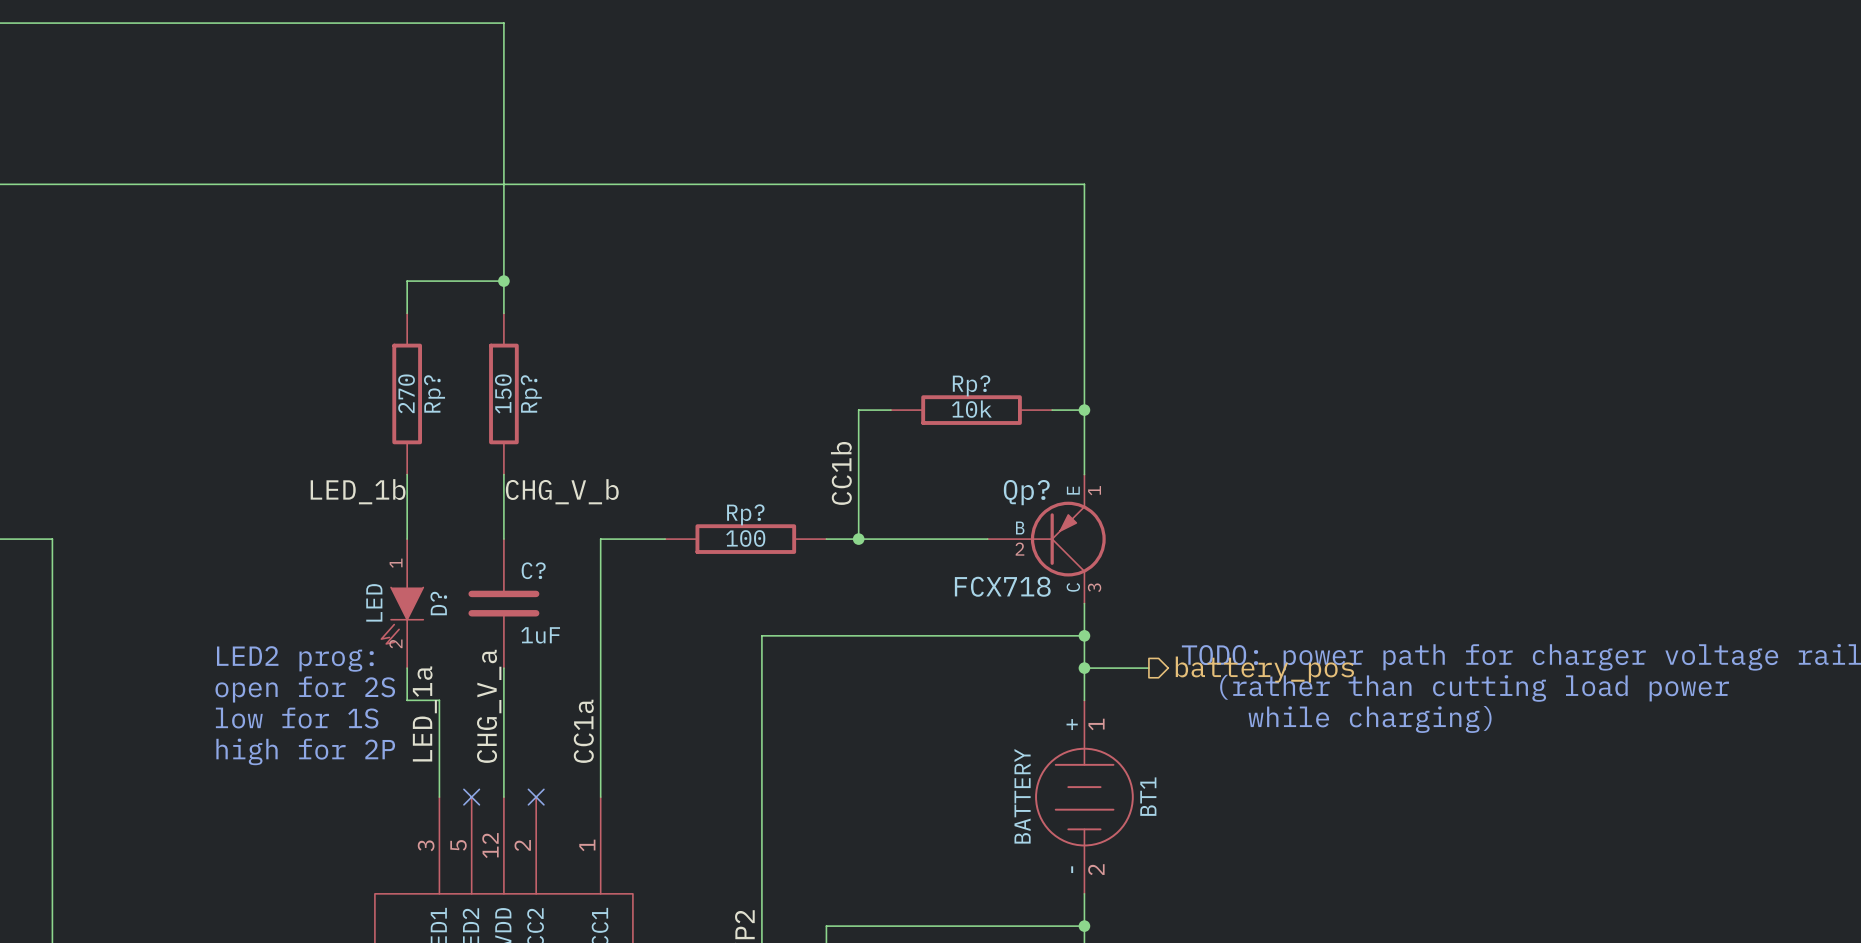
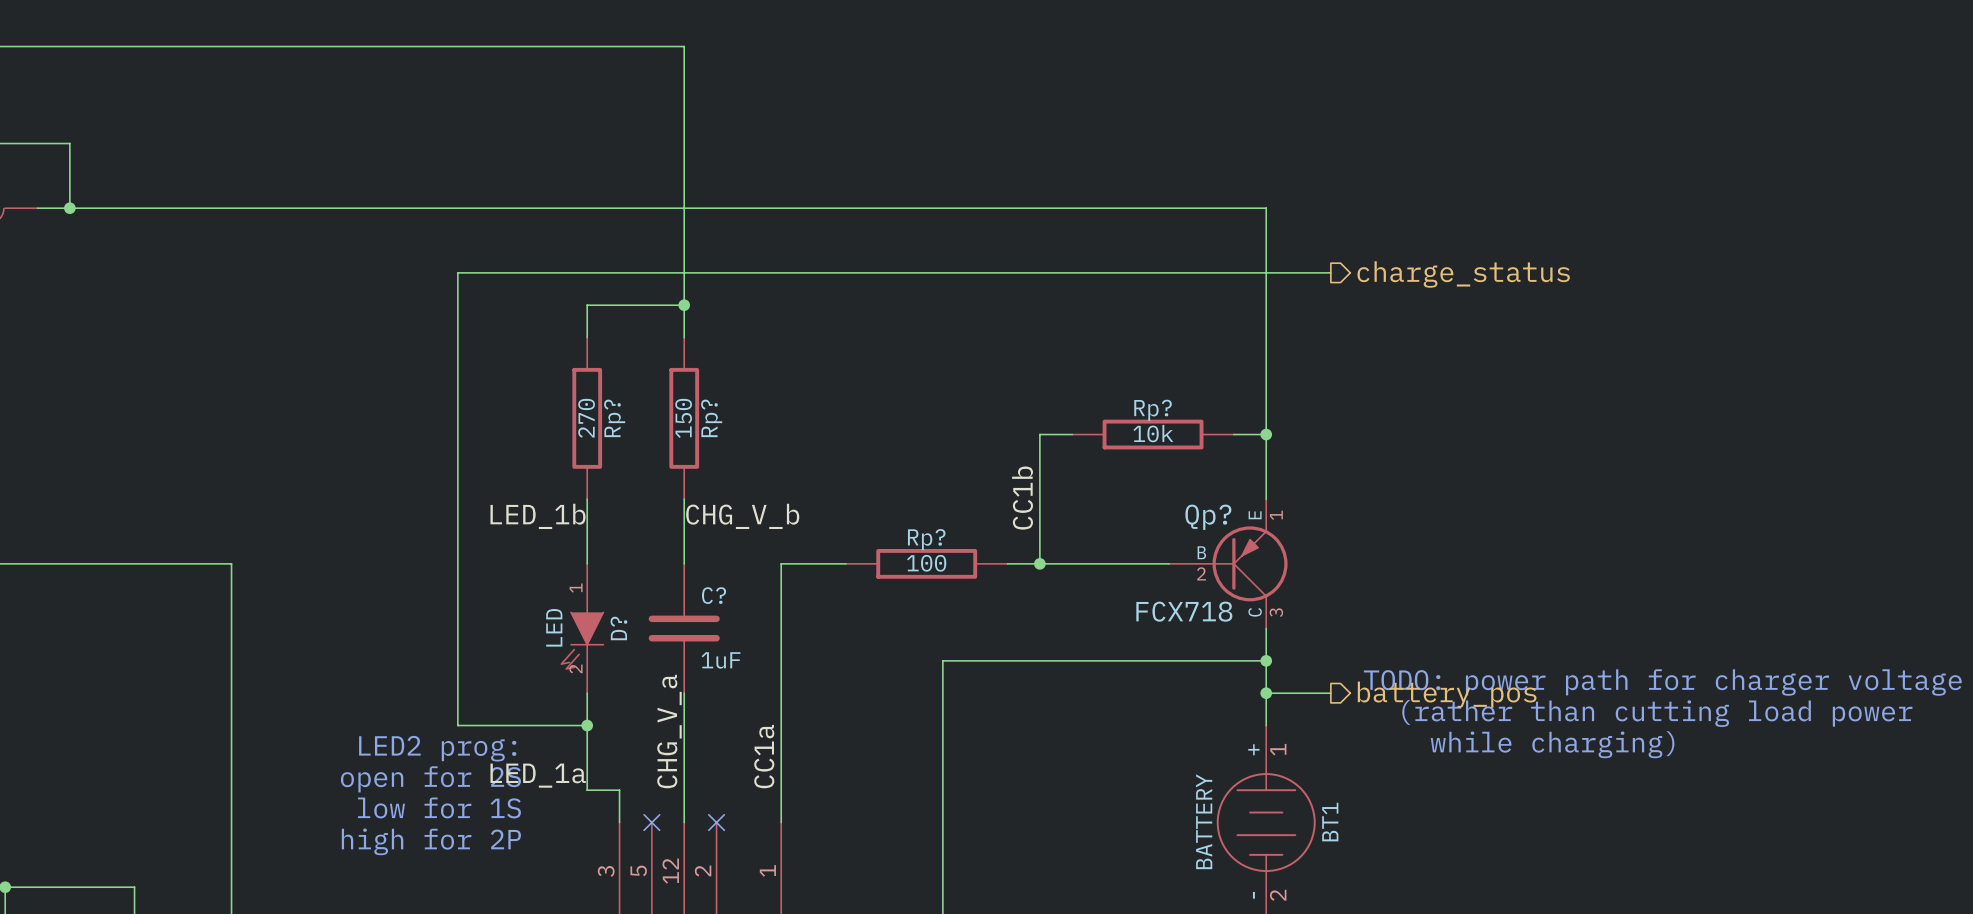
hierarchical label: none -> charge_status (1463, 274)
text position: LED2 prog: (295, 658) -> LED2 prog: (437, 748)
text position: open for 2S (305, 689) -> open for 2S (430, 779)
wire: (407, 700) (439, 700) (439, 764) -> (1330, 272) (457, 272) (457, 725) (587, 725) (587, 790) (619, 790)
junction: none -> (587, 725)
label rotation: 0° (424, 713) -> 90° clockwise (538, 775)
text position: low for 1S (297, 718) -> low for 1S (439, 807)
text position: high for 2P (305, 751) -> high for 2P (431, 841)

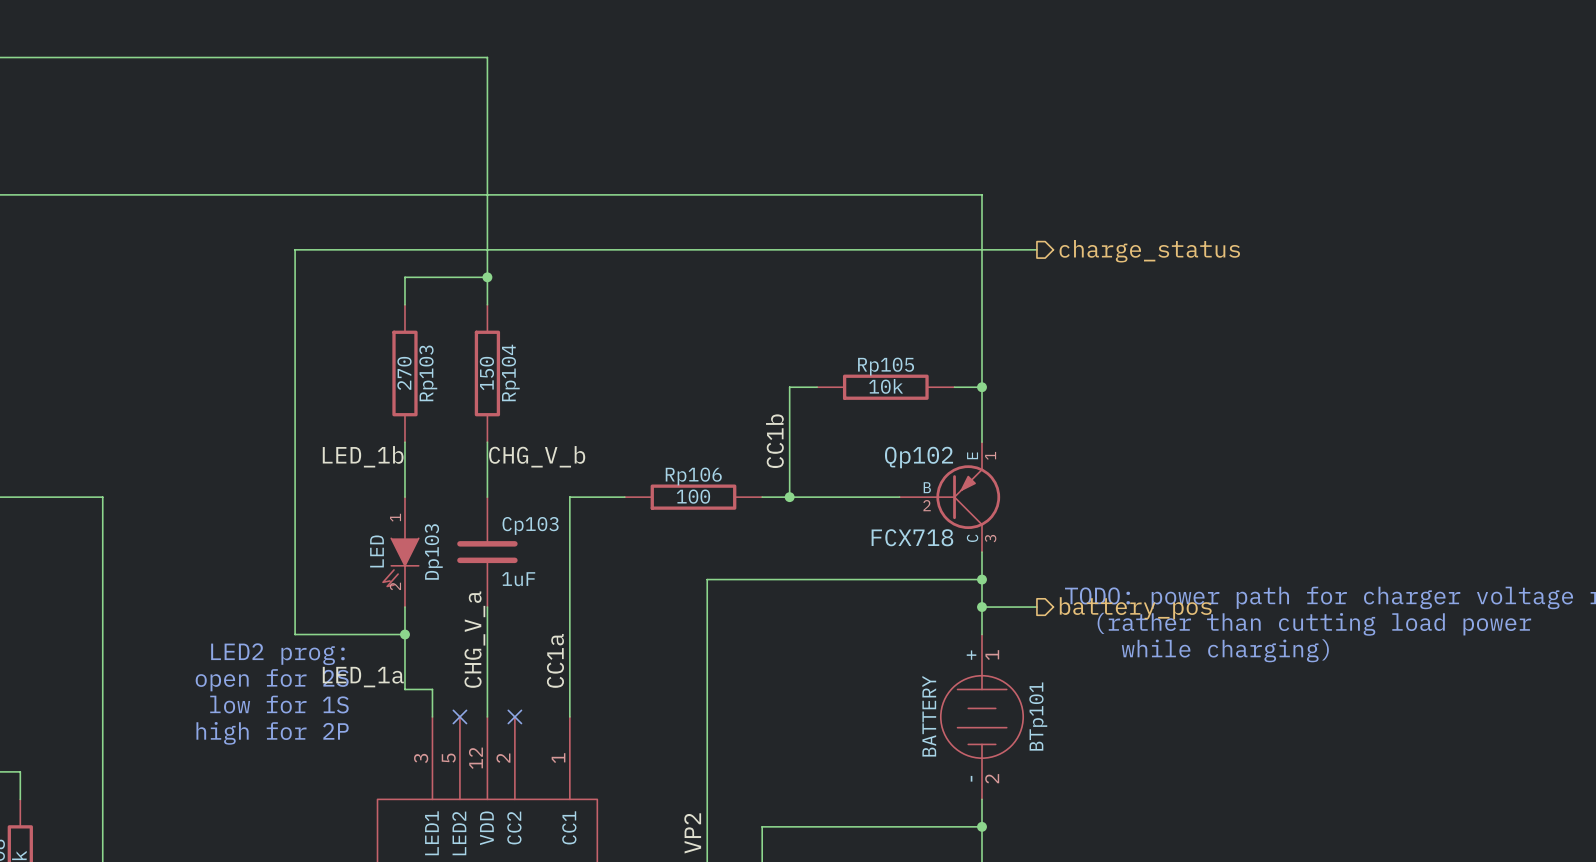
Rp? name: Rp? (1153, 410) -> Rp105 (886, 366)
Rp? name: Rp? (614, 418) -> Rp103 (428, 373)
Rp? name: Rp? (711, 418) -> Rp104 (510, 372)
Qp? name: Qp? (1208, 517) -> Qp102 (919, 457)
Rp? name: Rp? (926, 539) -> Rp106 (693, 476)
C? name: C? (714, 595) -> Cp103 (530, 525)
D? name: D? (618, 628) -> Dp103 (433, 551)
BT1 name: BT1 (1330, 822) -> BTp101 (1038, 716)

